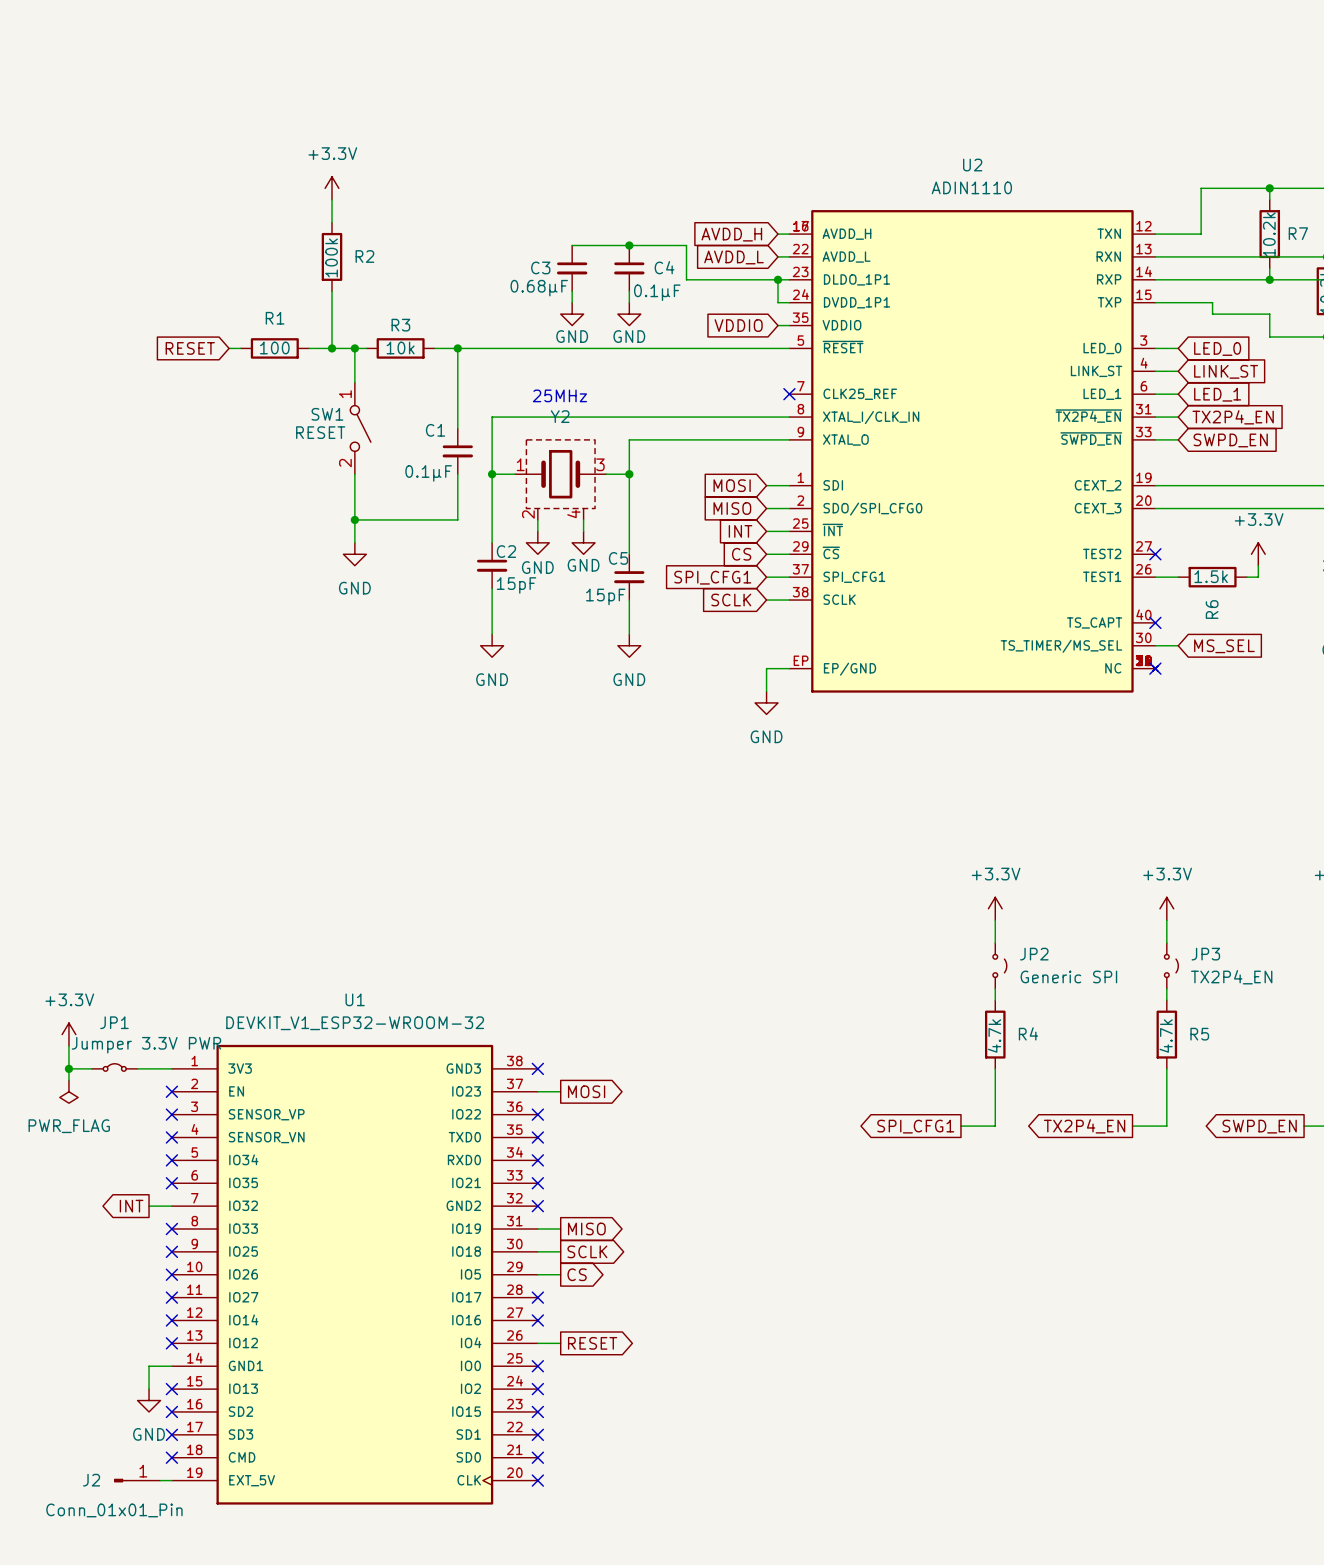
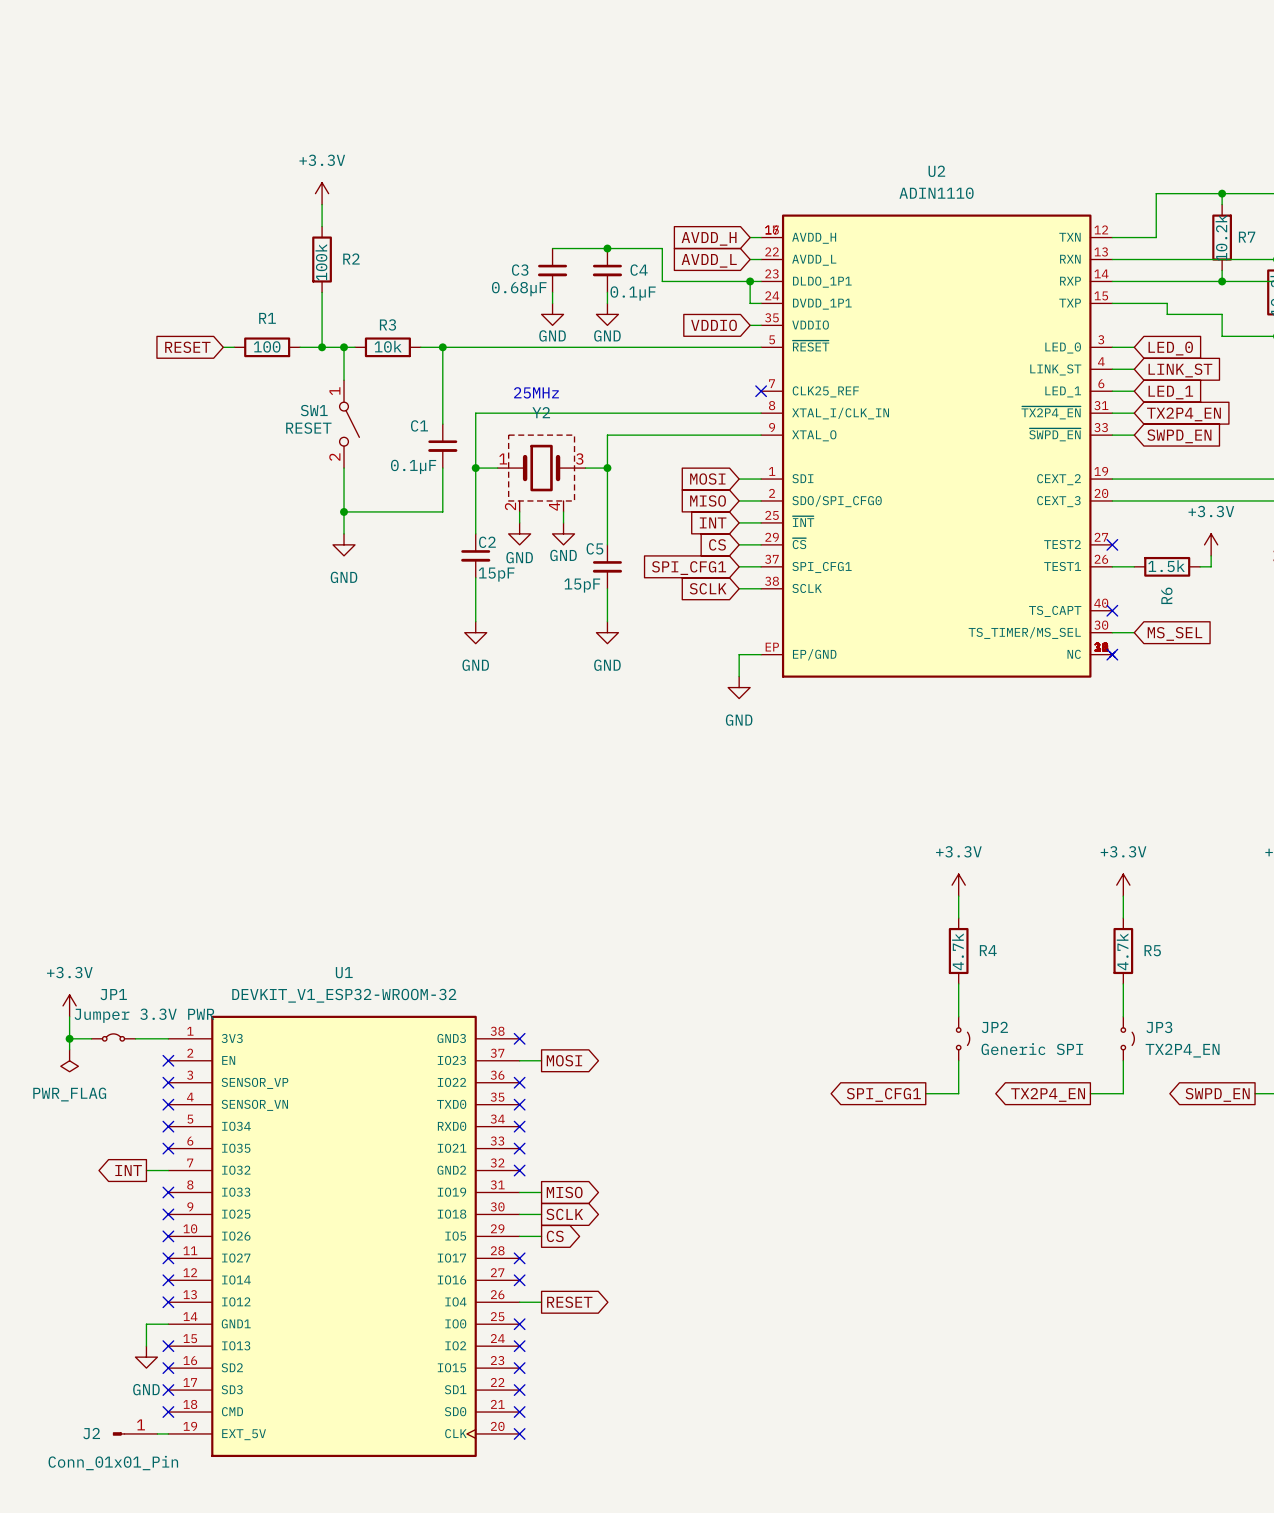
JP2 position: (999, 965) -> (963, 1038)
JP3 position: (1171, 965) -> (1127, 1038)
wire: (995, 988) (995, 1000) -> none
wire: (1166, 988) (1166, 1000) -> none
wire: none -> (958, 983) (958, 1016)
wire: none -> (1123, 983) (1123, 1016)
R4 position: (995, 1034) -> (958, 951)
R5 position: (1166, 1034) -> (1123, 951)

